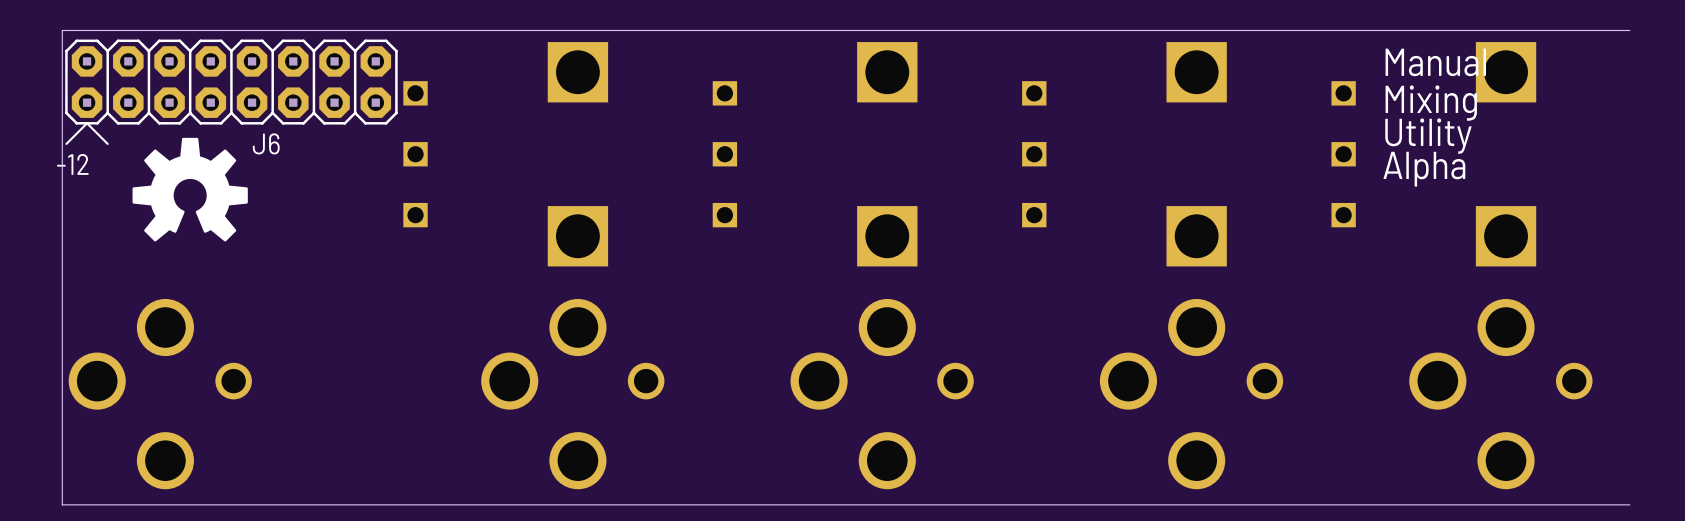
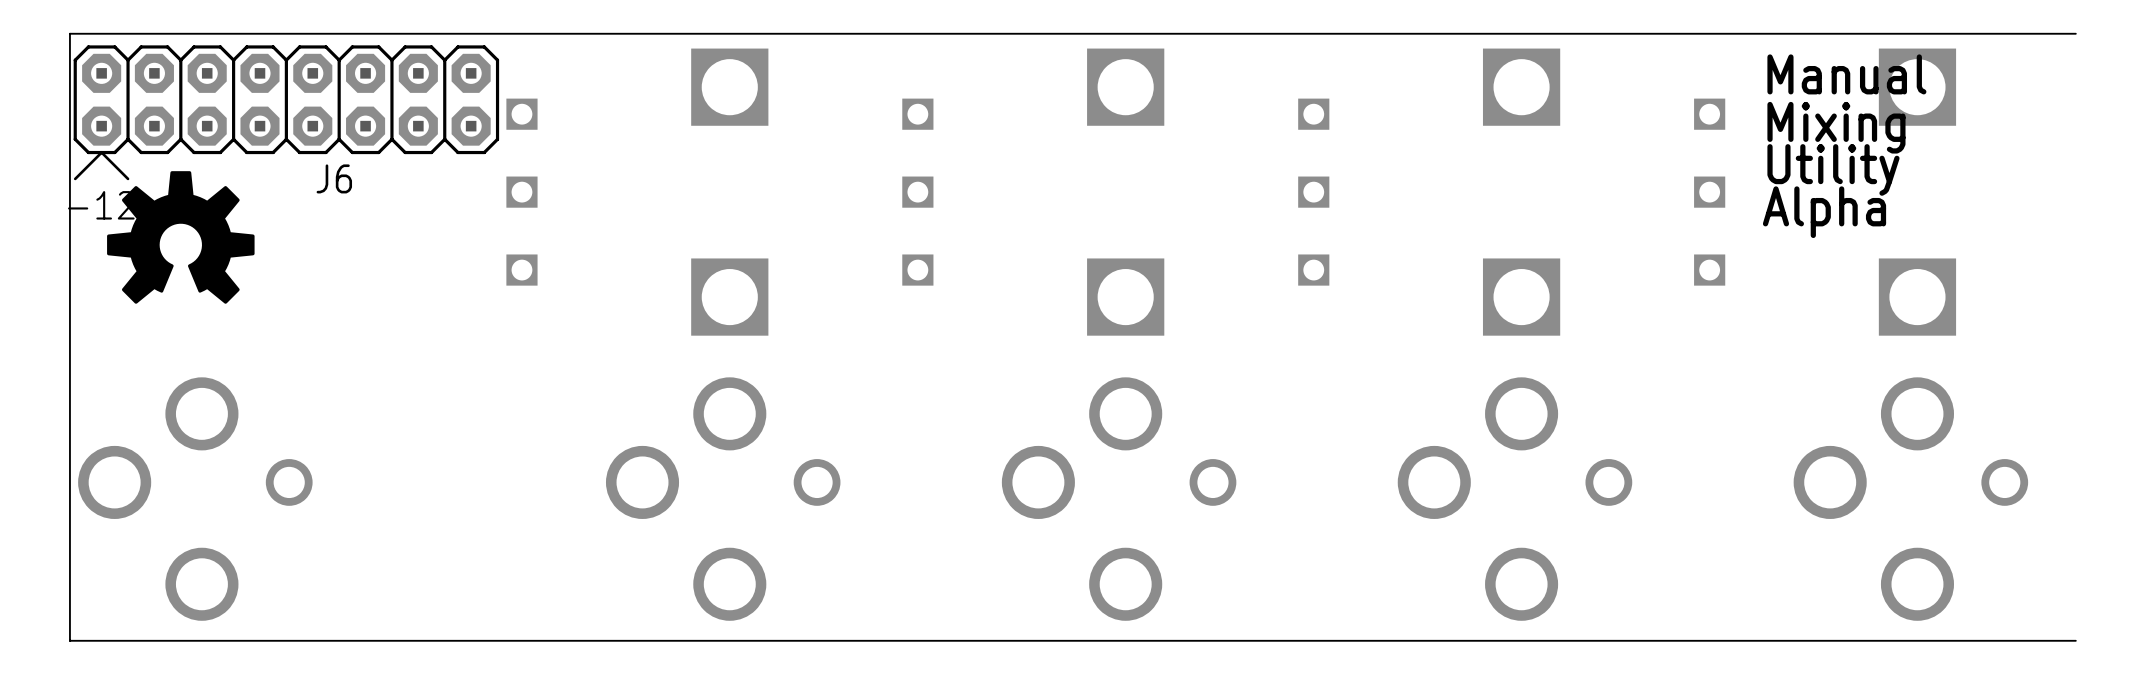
drawing position: (190, 189) -> (180, 237)

